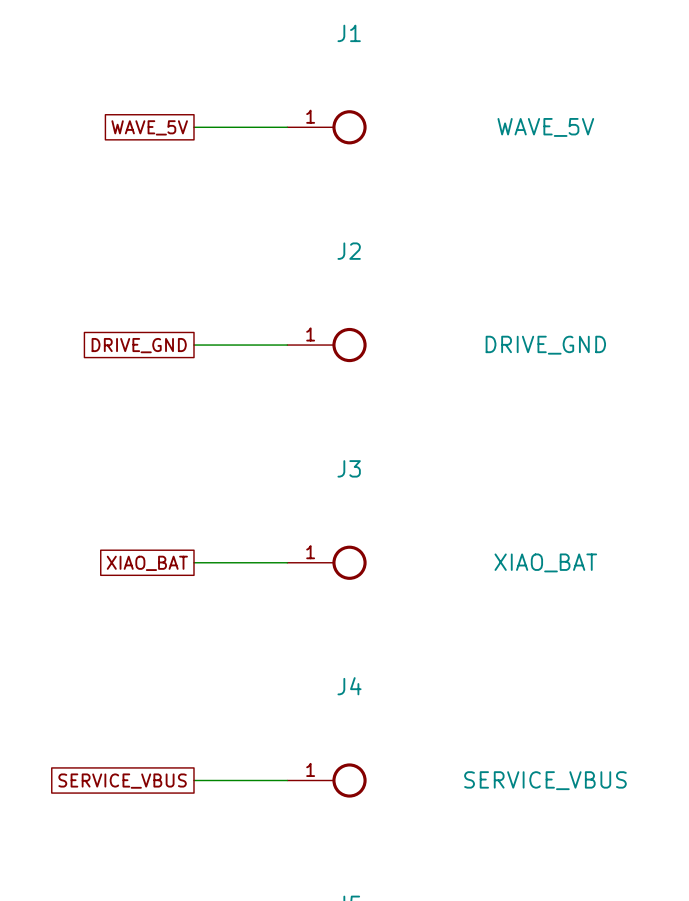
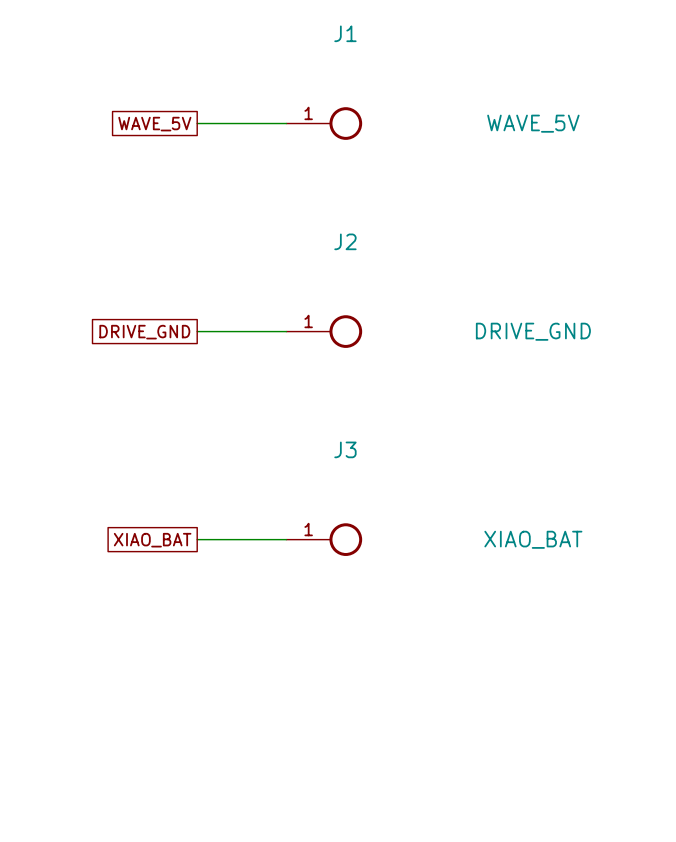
wire: (193, 780) (287, 780) -> none
J4: SERVICE_VBUS (326, 780) -> none
global label: SERVICE_VBUS (122, 781) -> none

